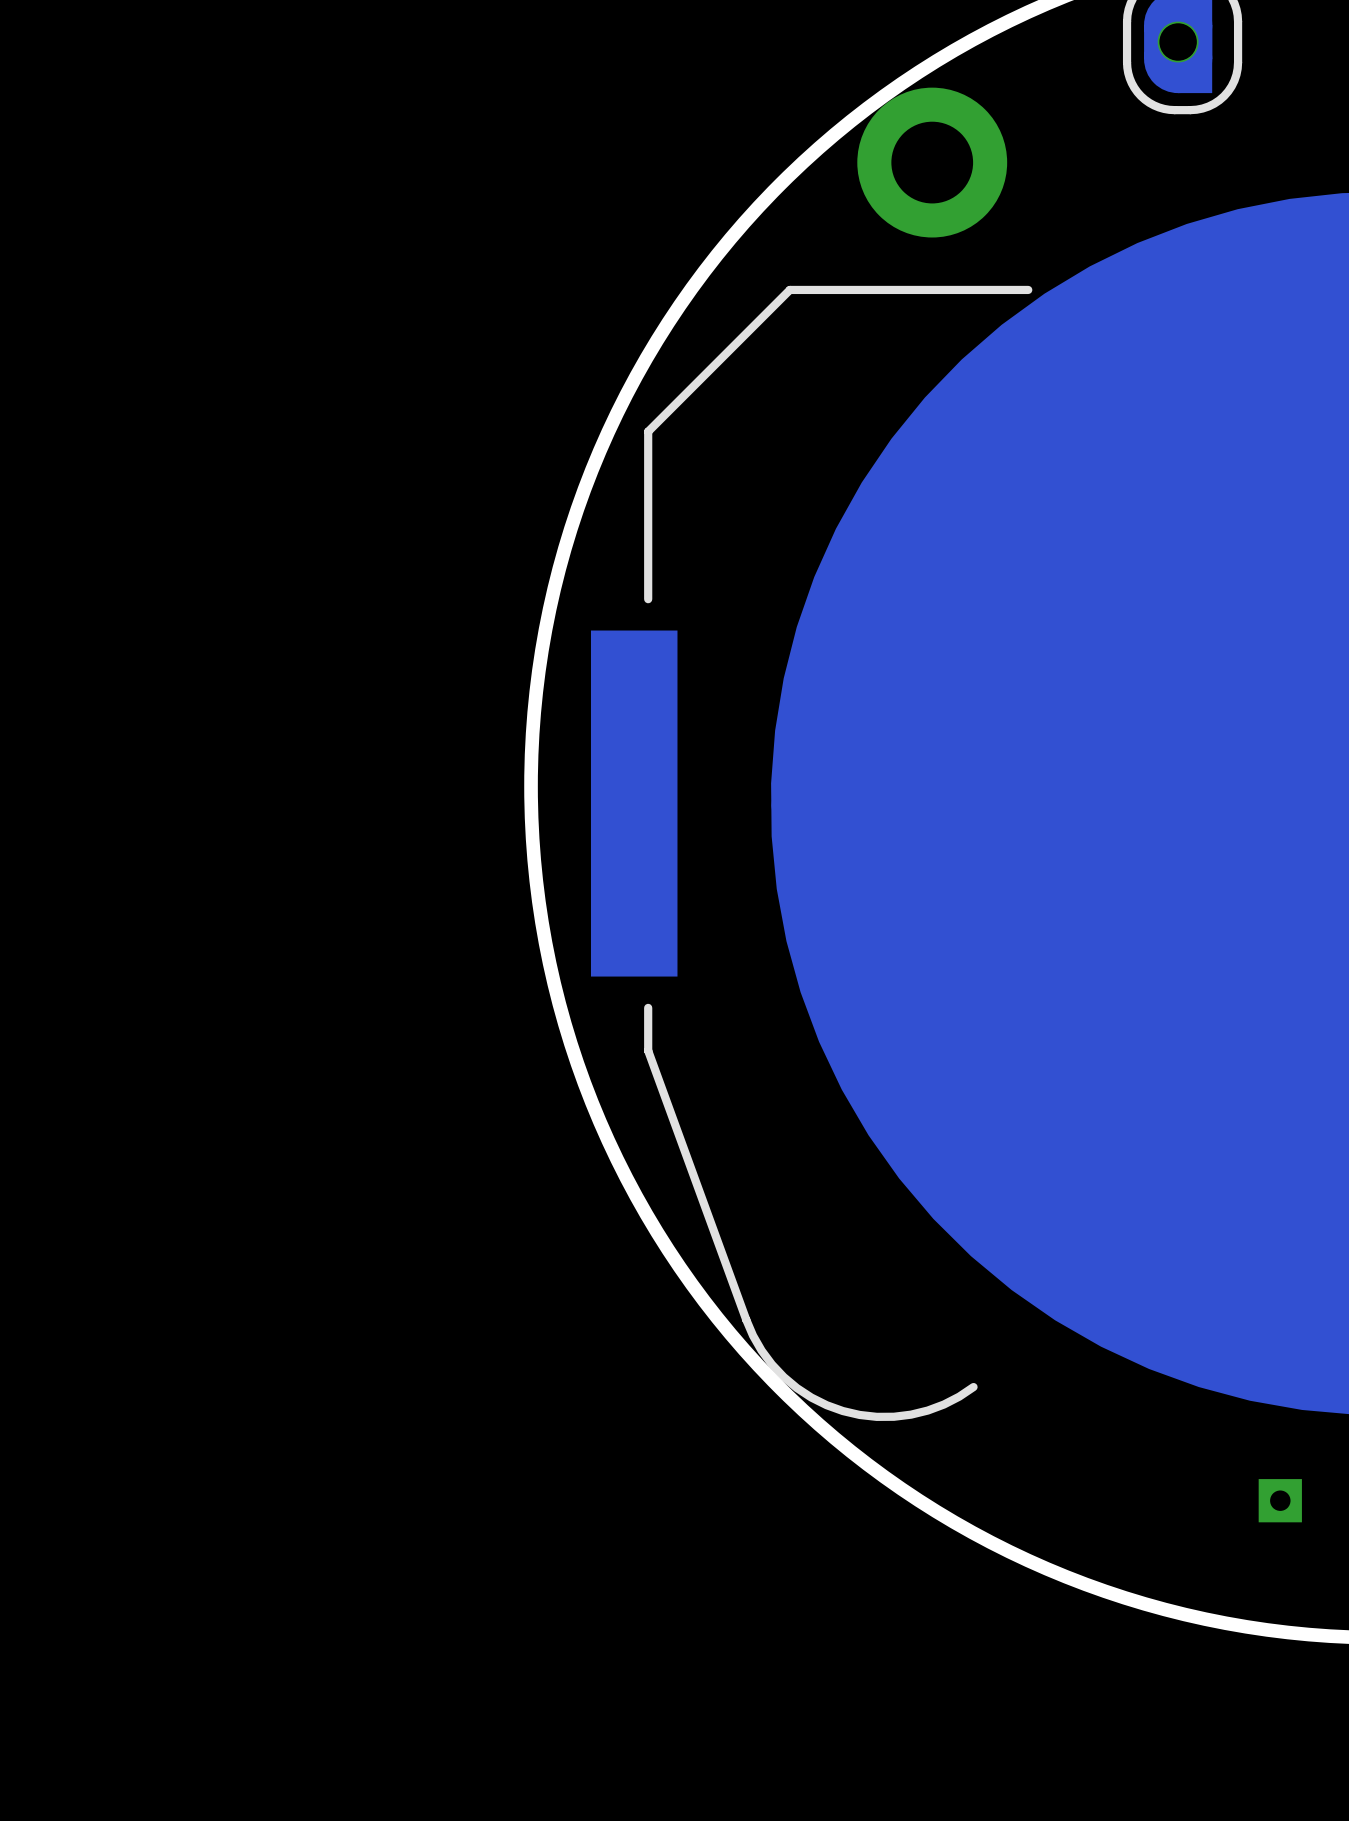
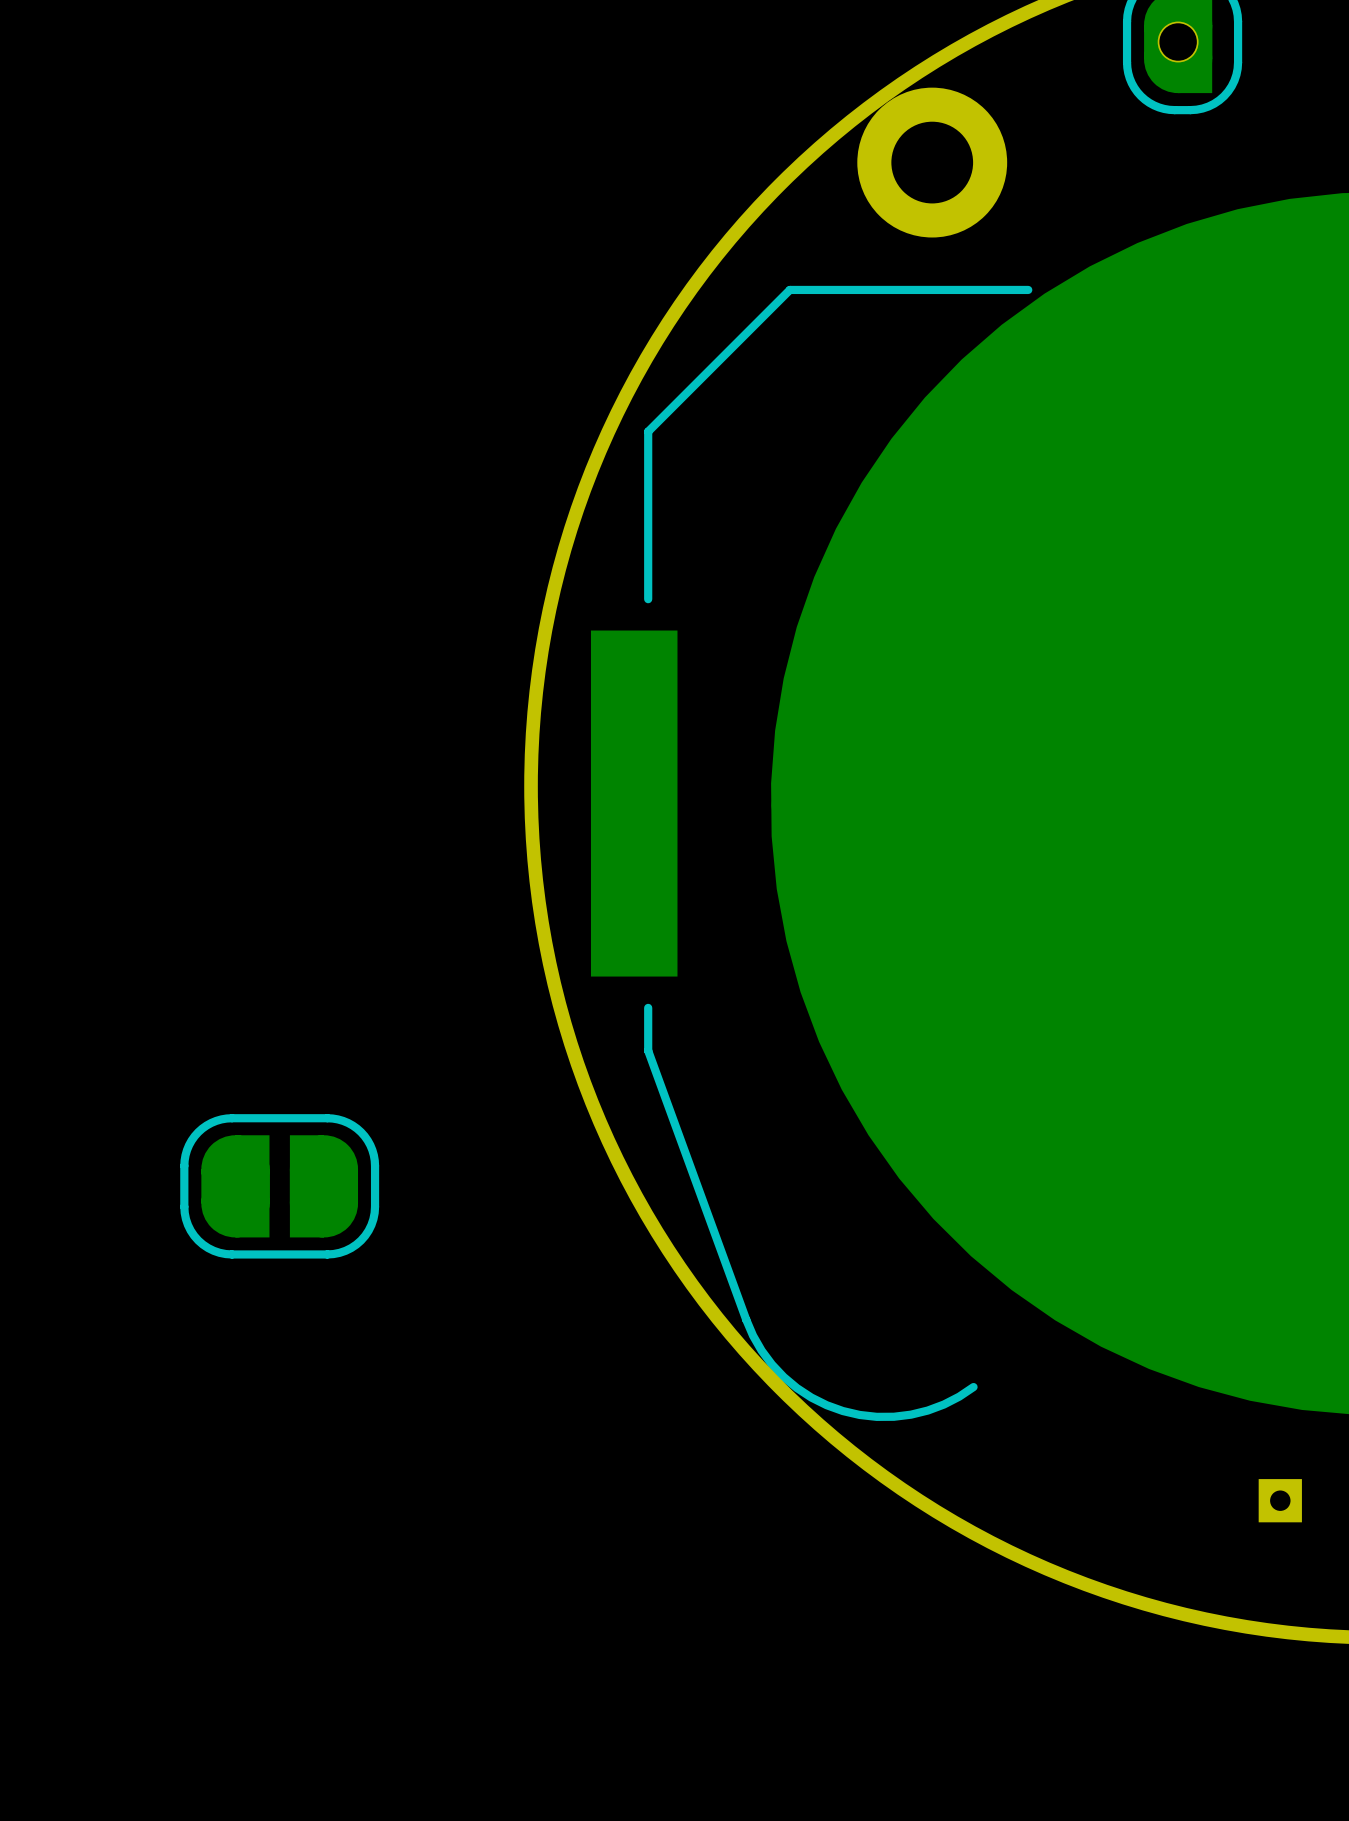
part: none -> (279, 1186)

